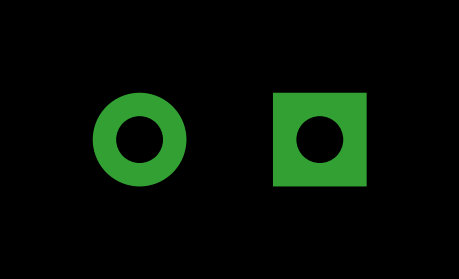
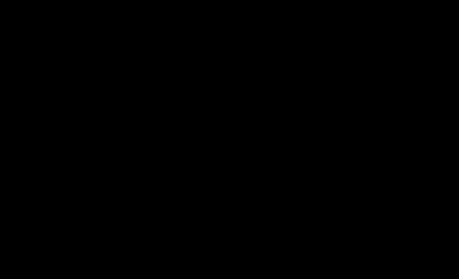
part: (229, 139) -> none

